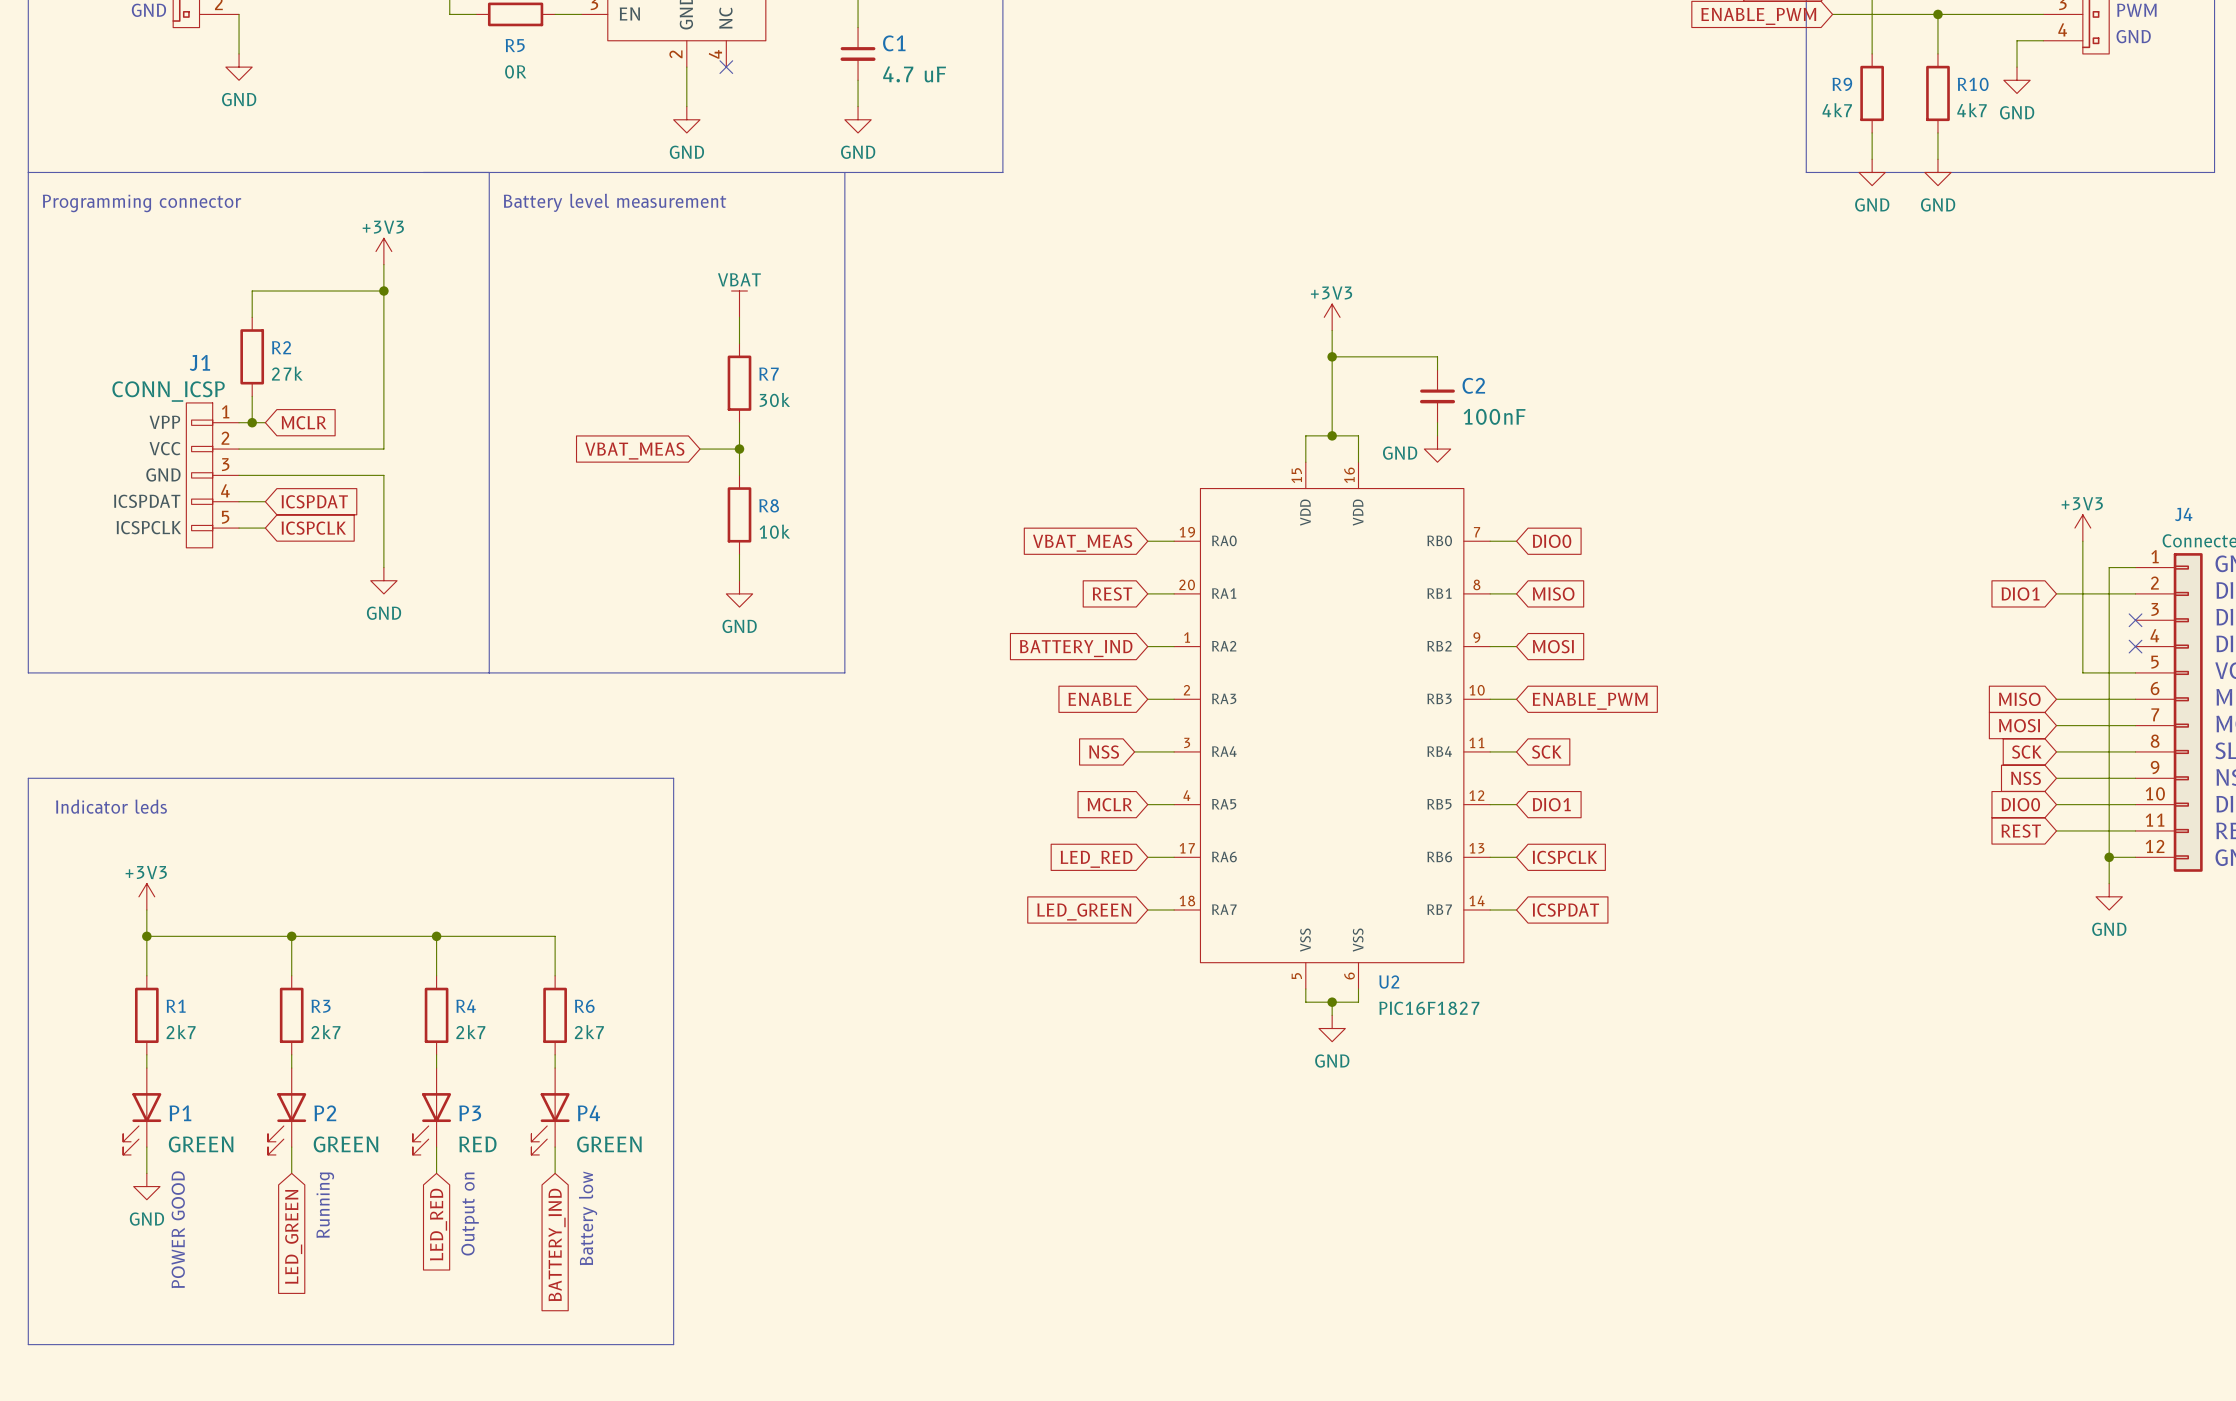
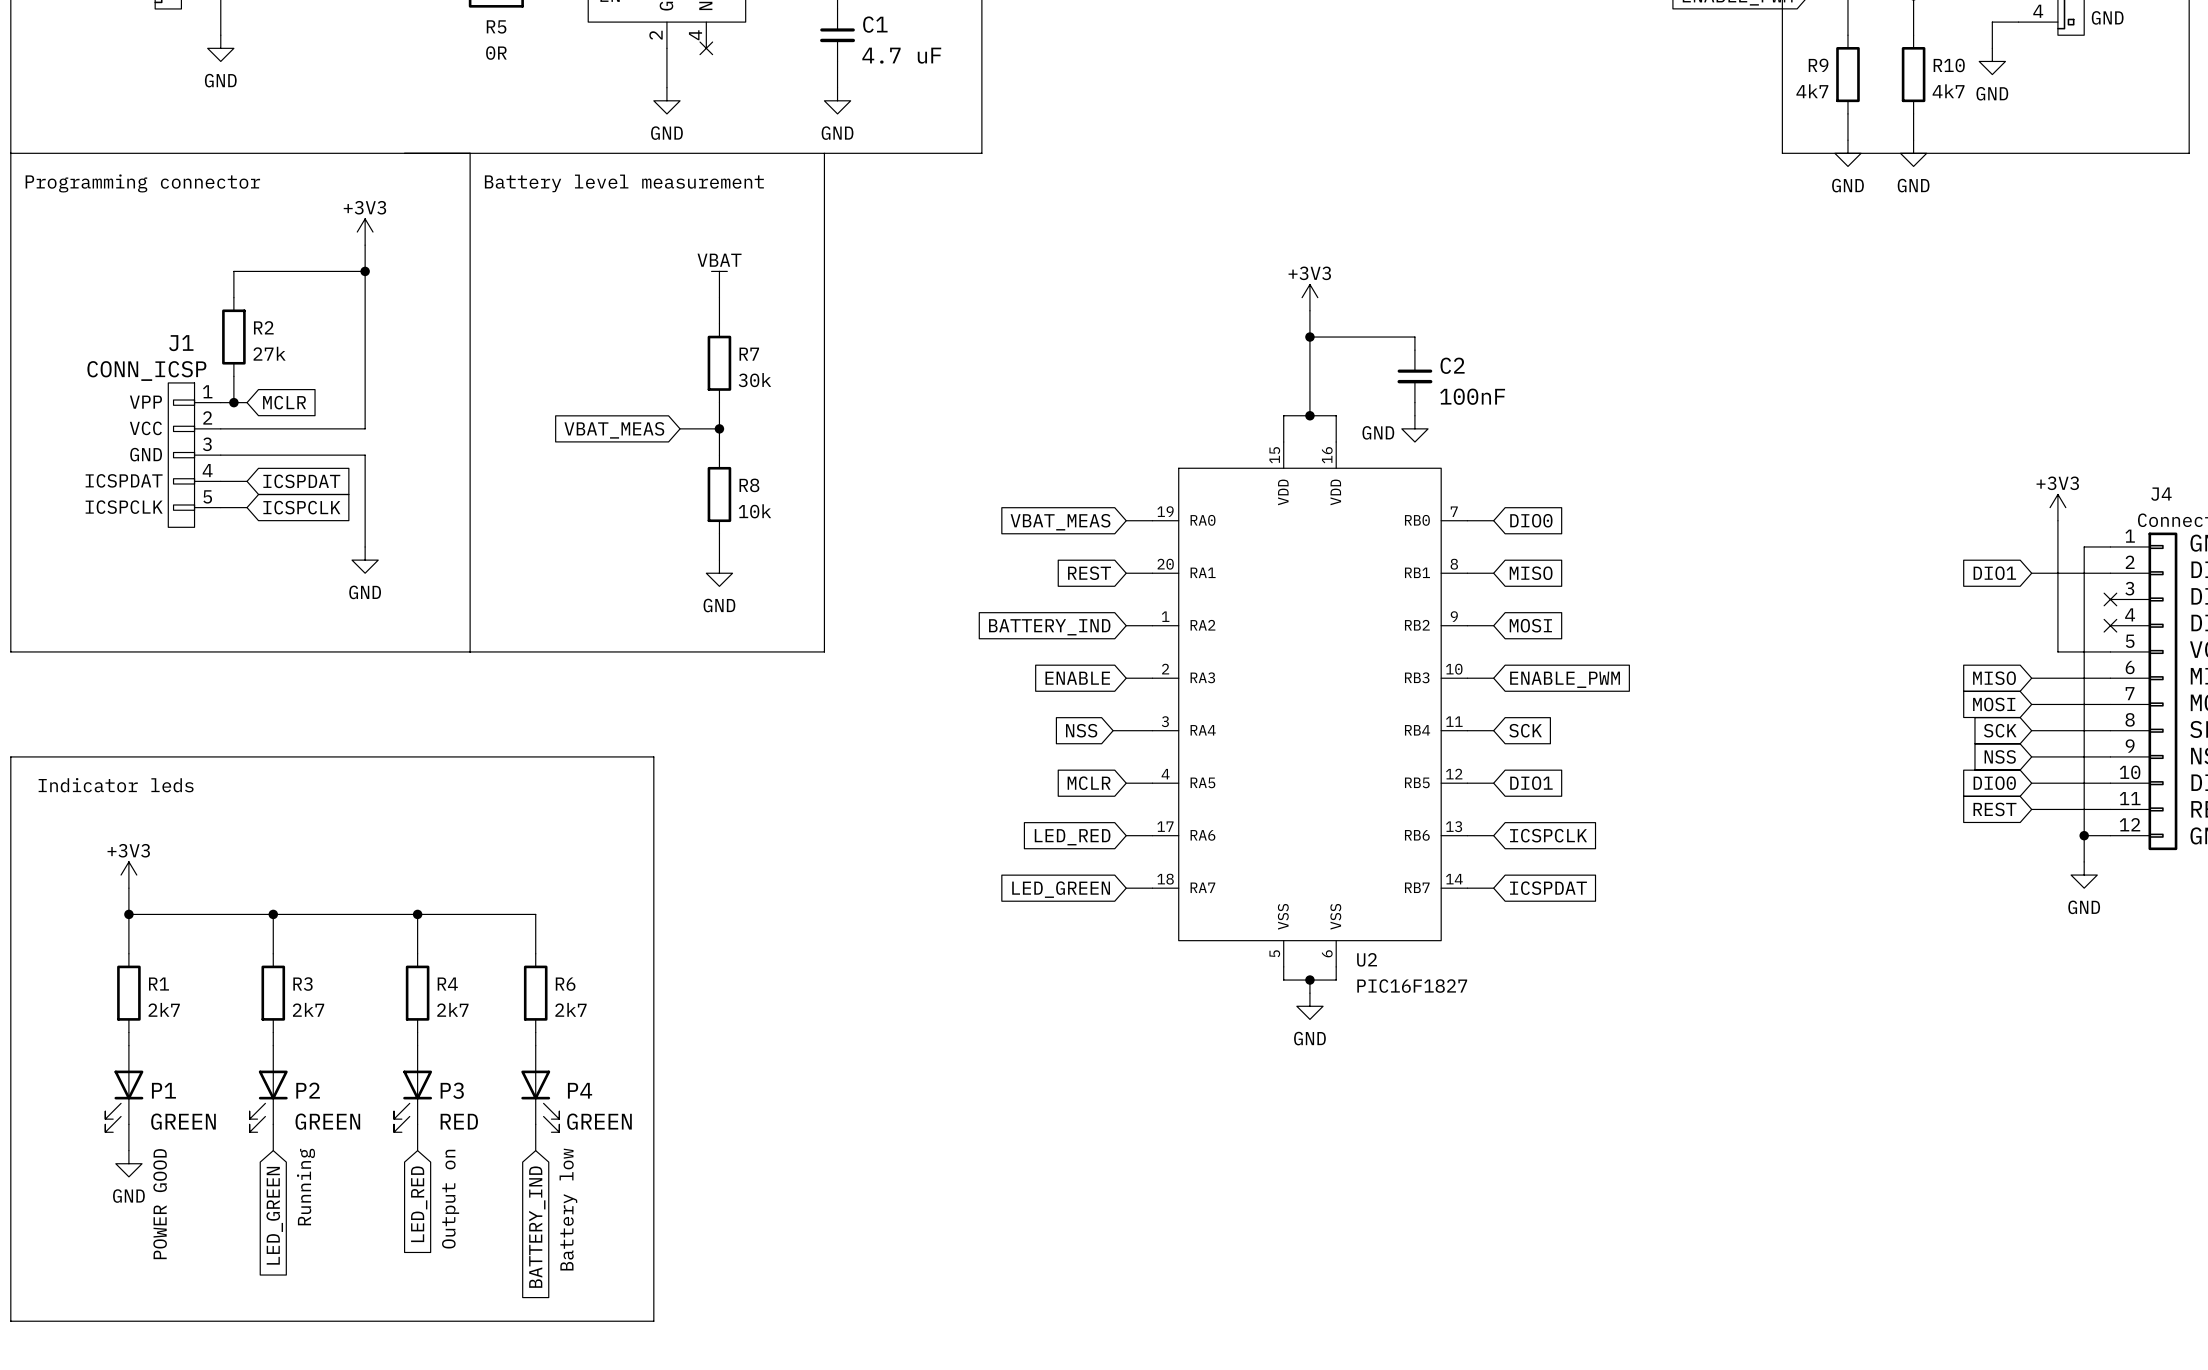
P4 flip: as is (550, 1124) -> left-right (540, 1101)

